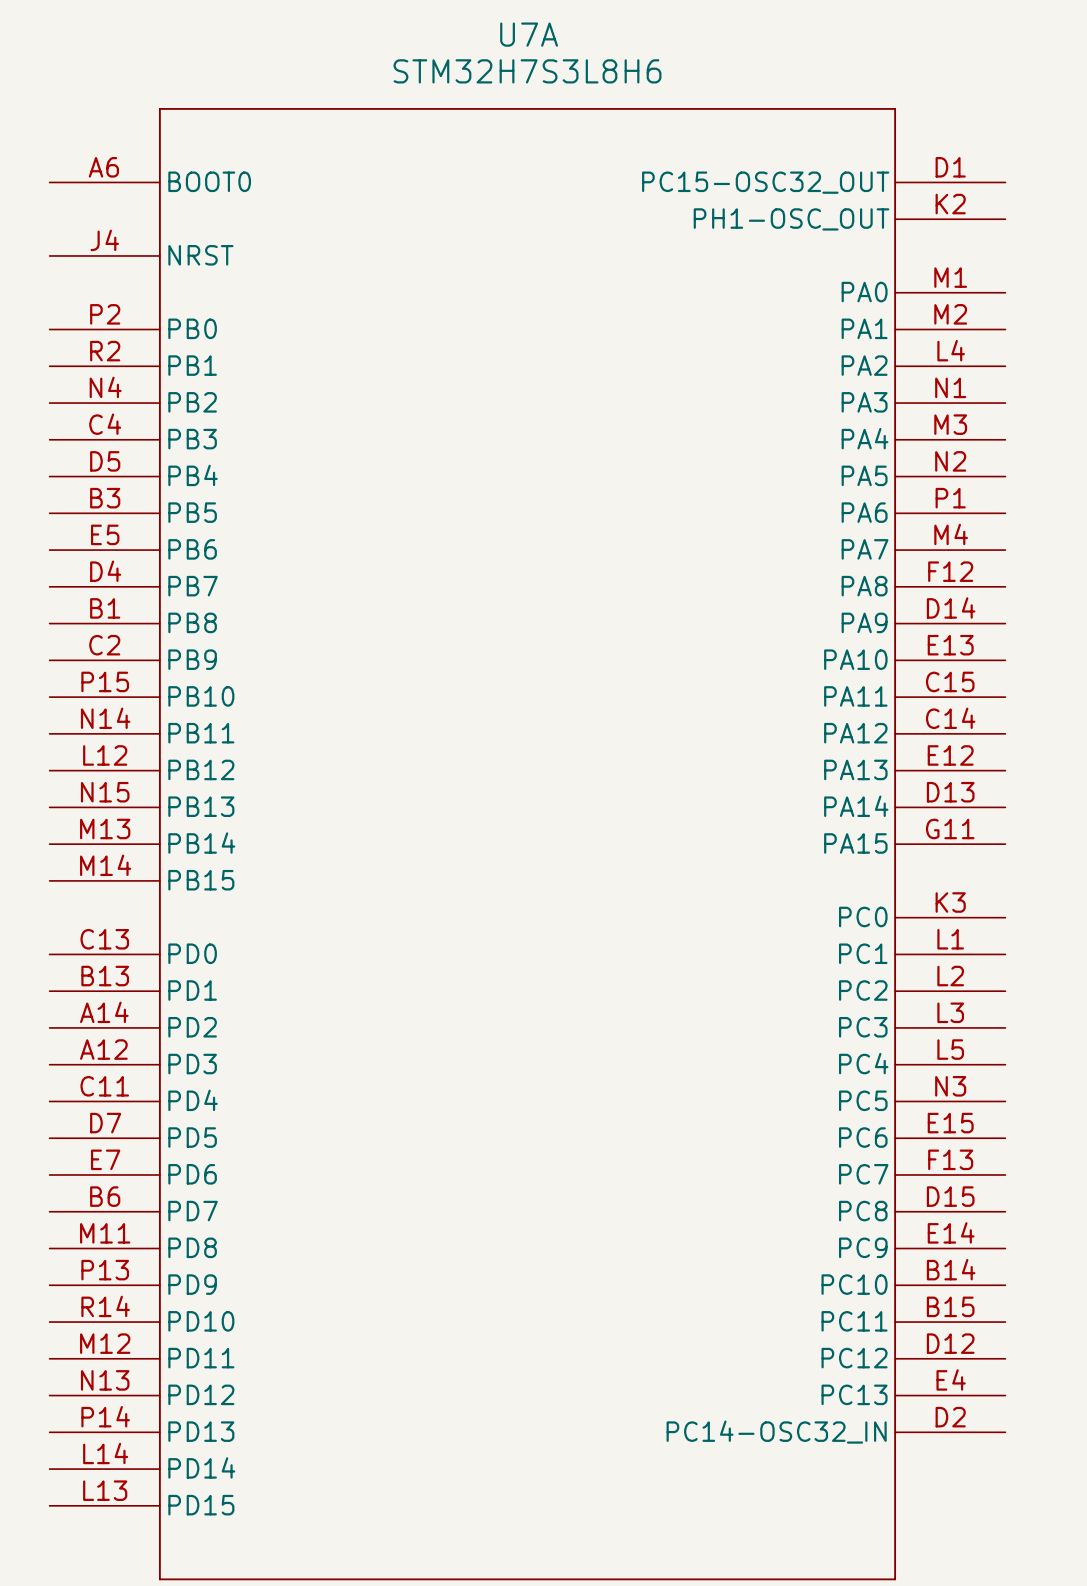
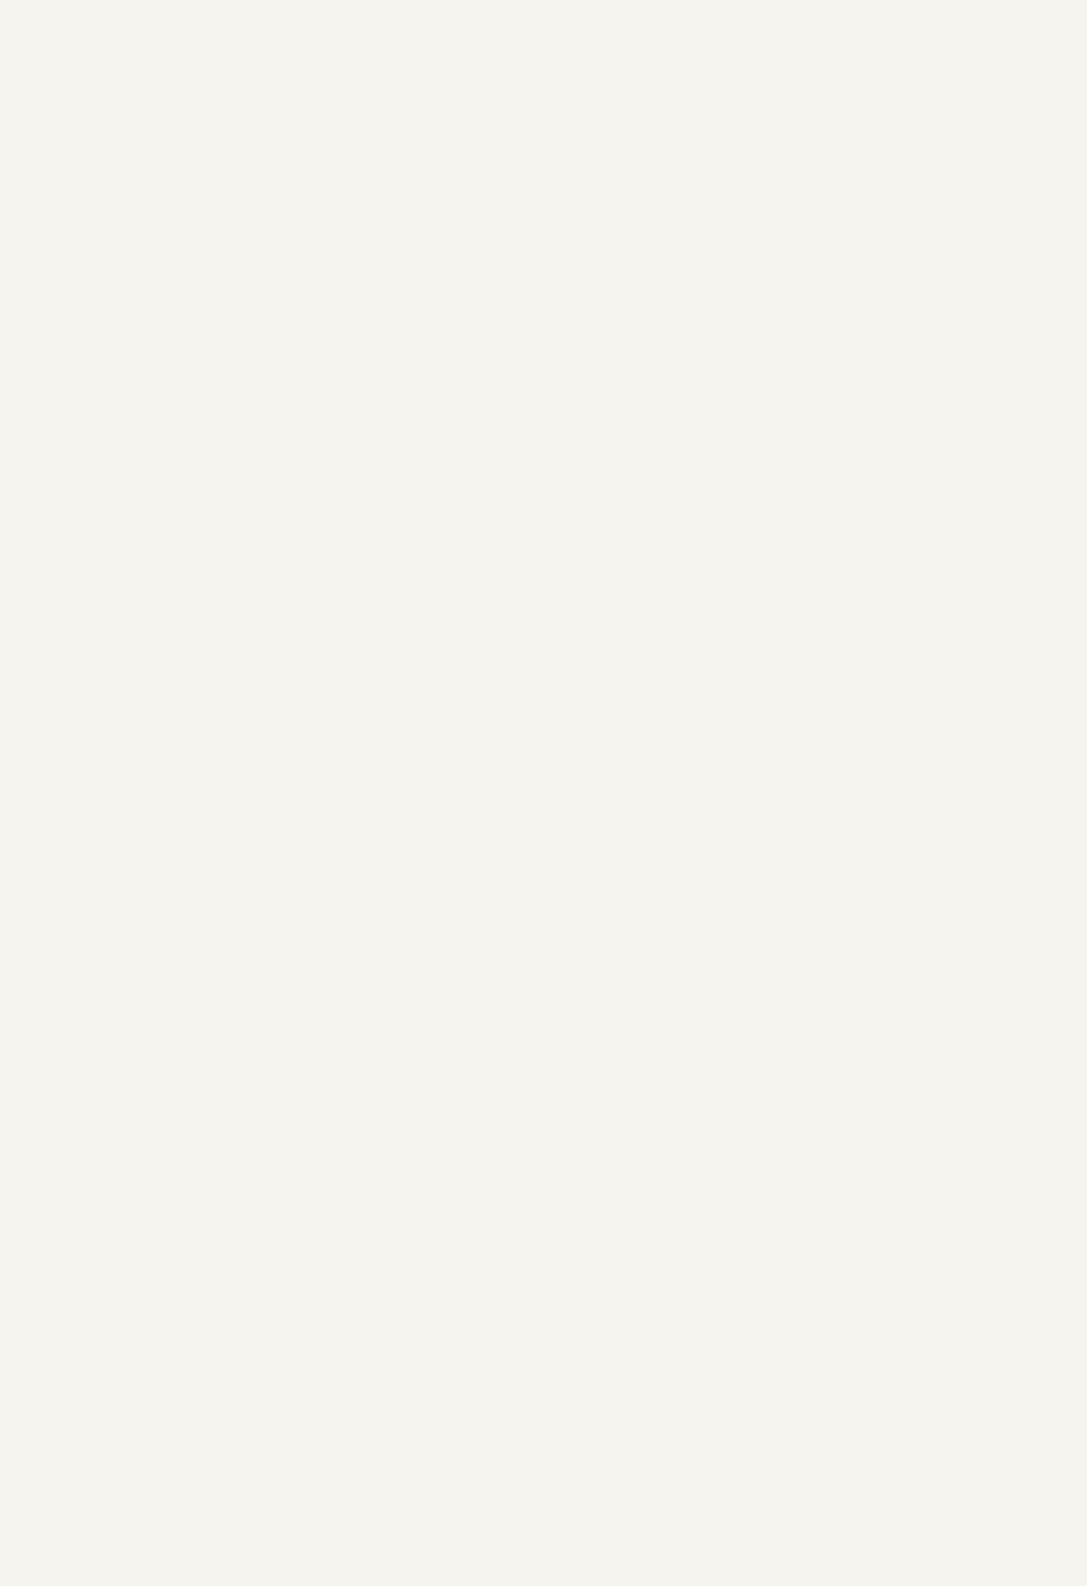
U7A: STM32H7S3L8H6 (527, 844) -> none

